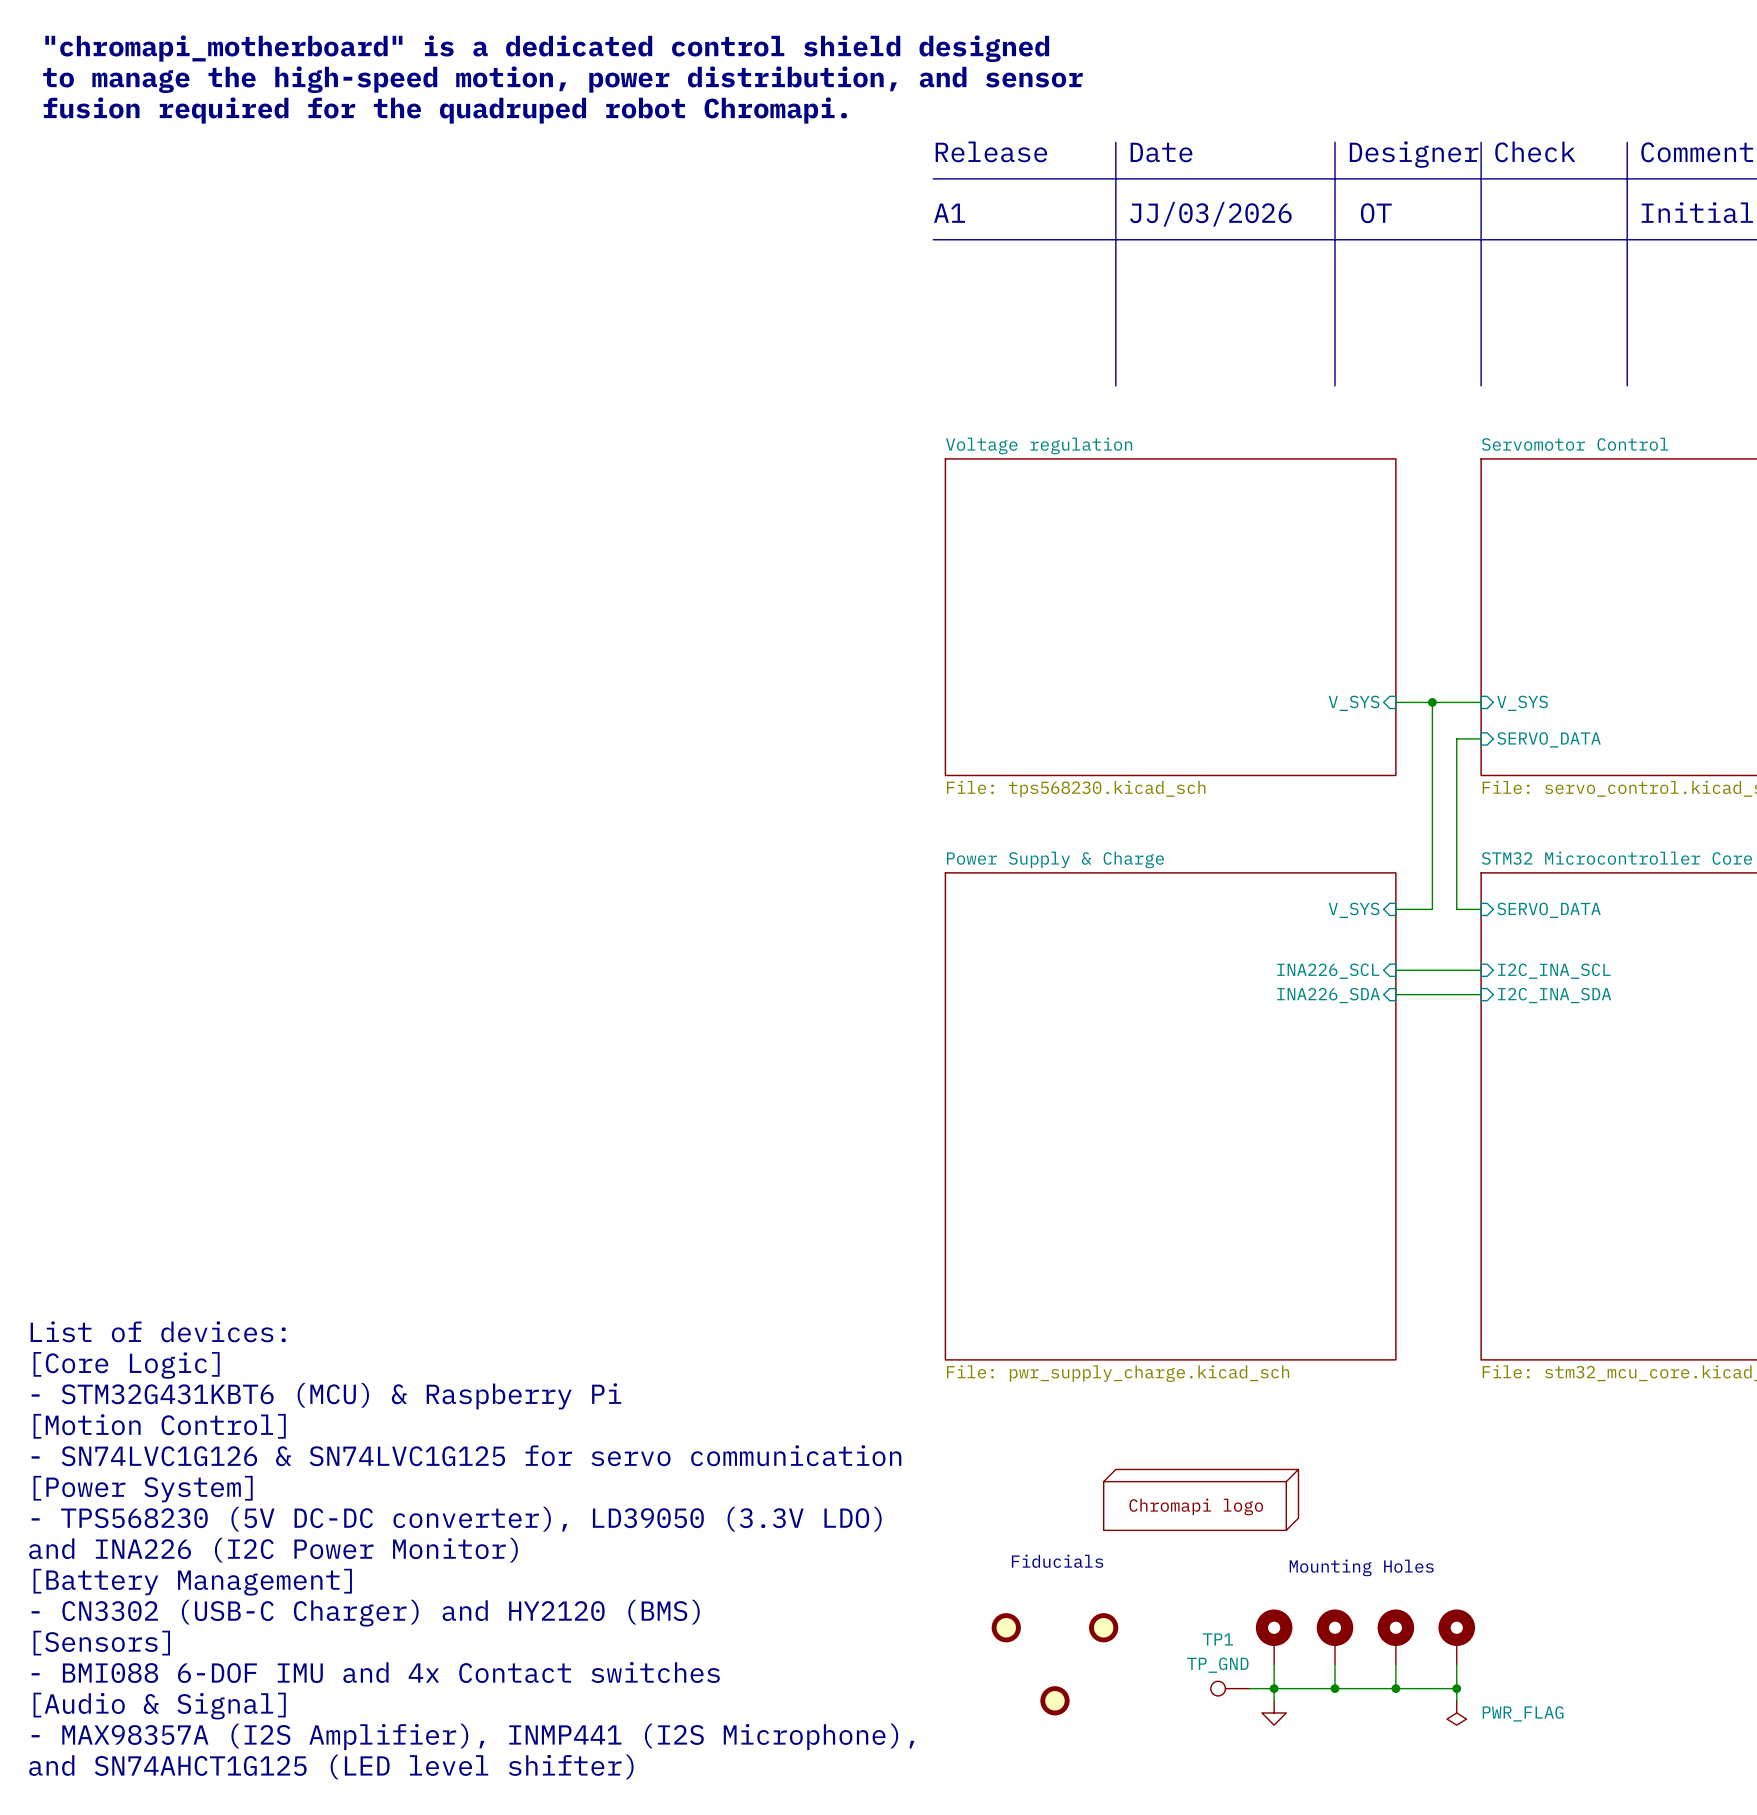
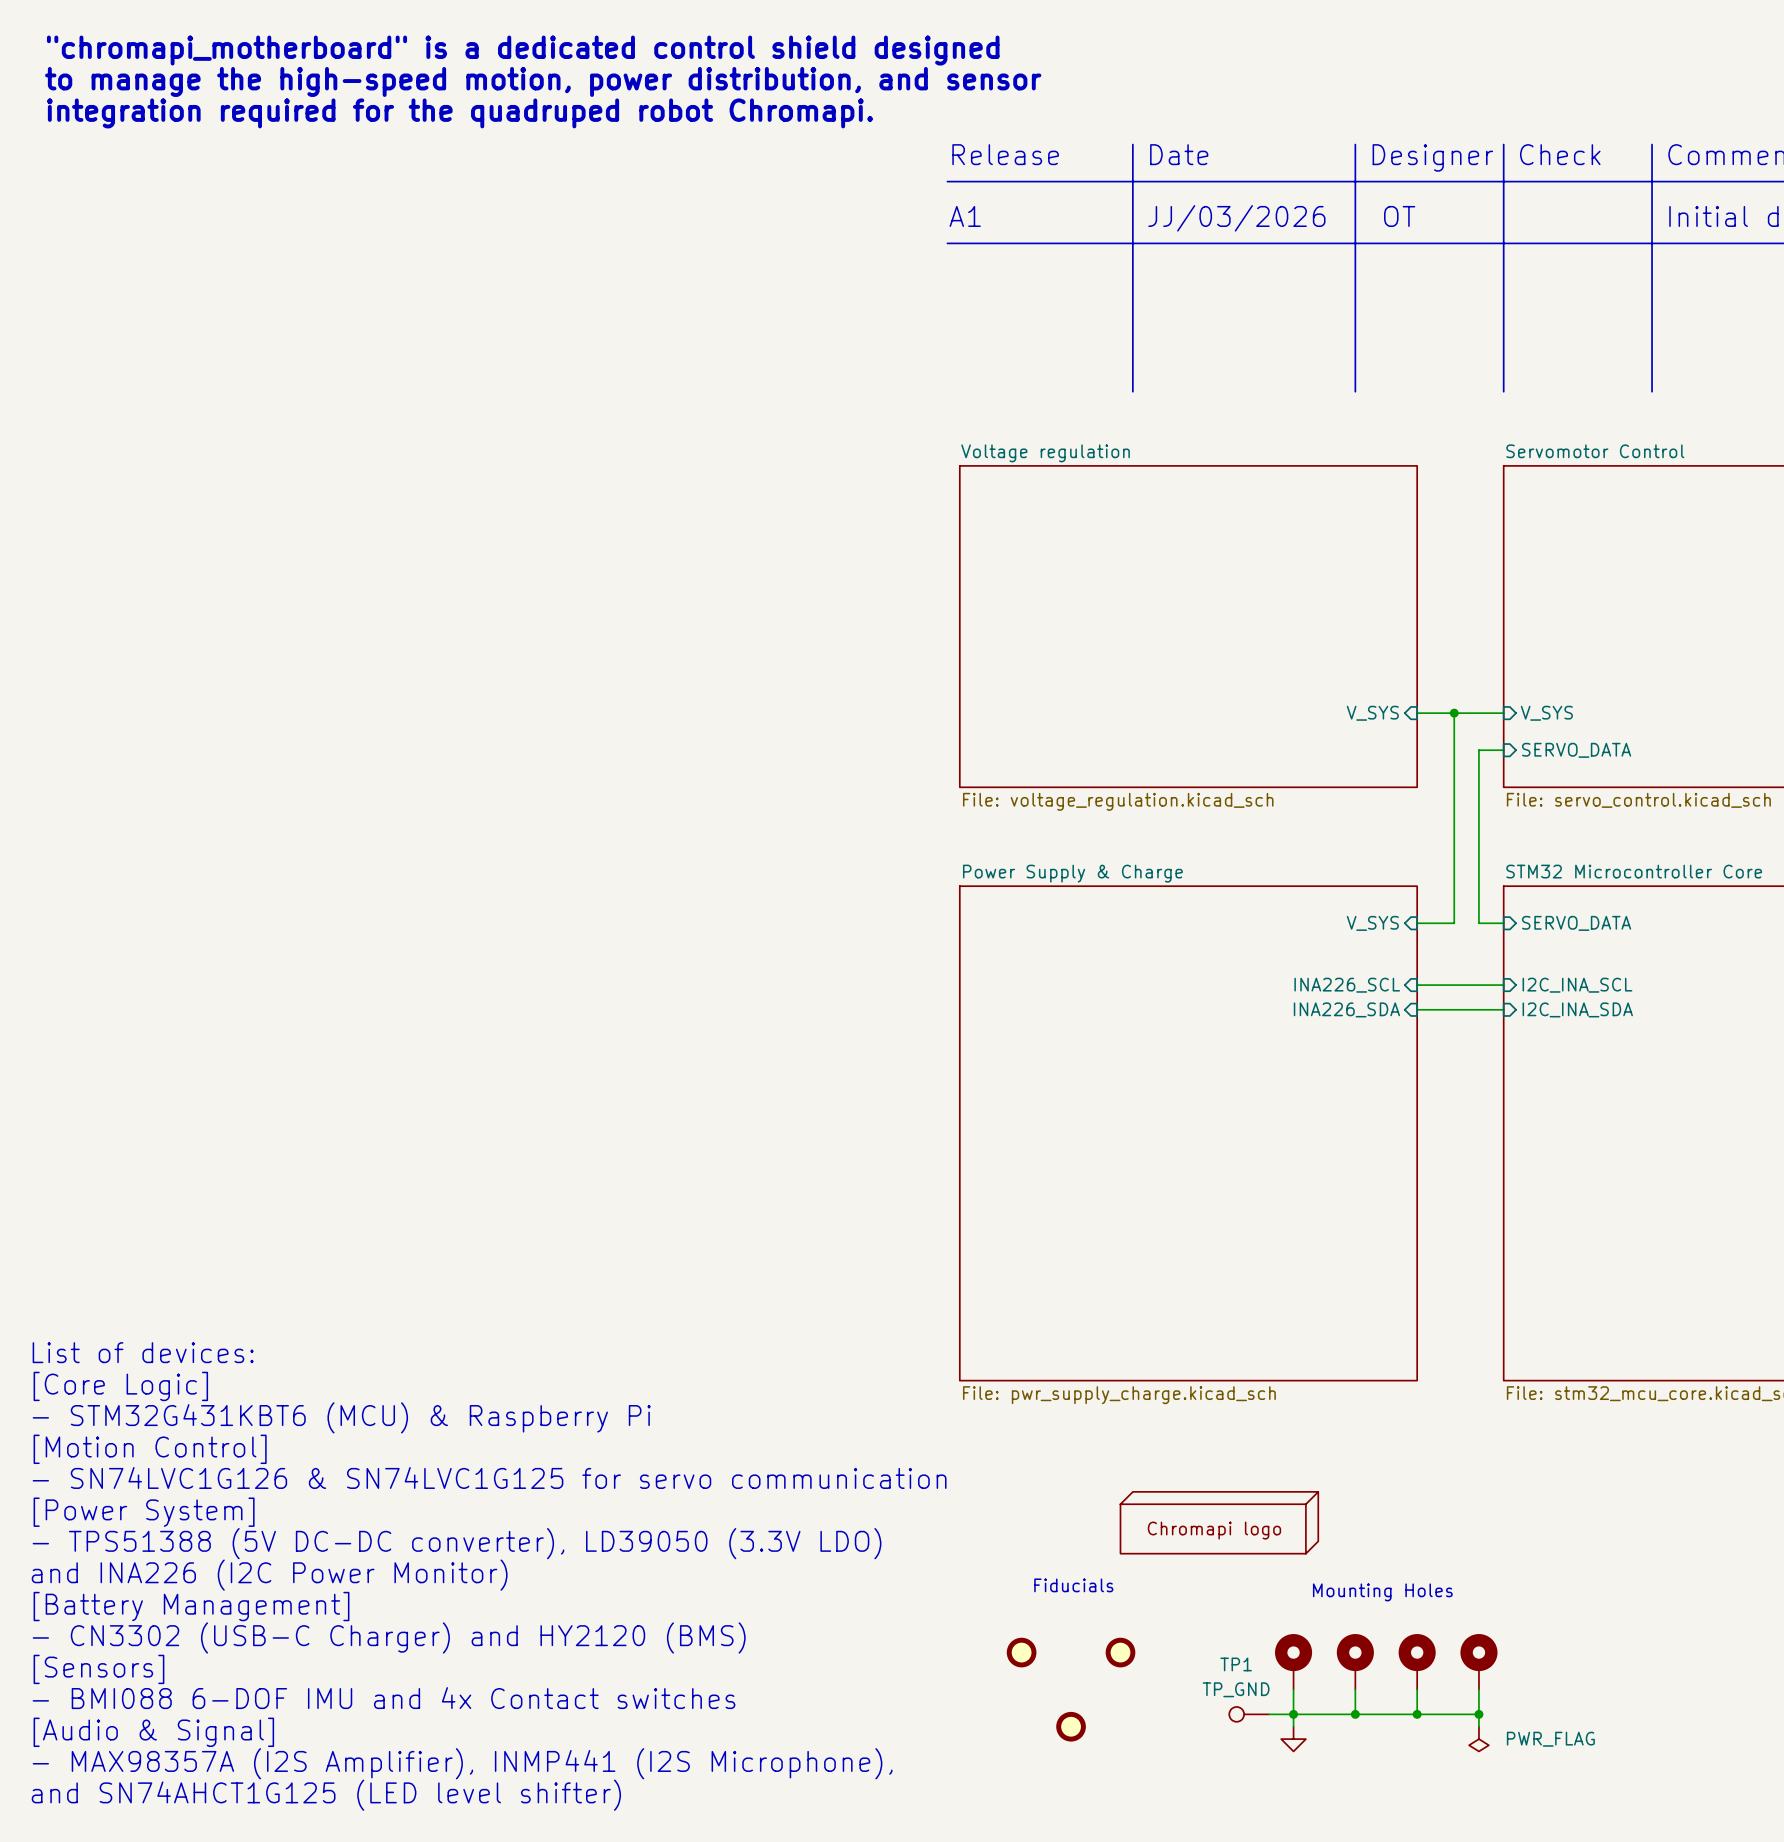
text: fusion required for the quadruped robot Chromapi. (445, 110) -> integration required for the quadruped robot Chromapi. (459, 113)
sheet Voltage regulation value: File: tps568230.kicad_sch (1076, 789) -> File: voltage_regulation.kicad_sch (1118, 801)
text: - TPS568230 (5V DC-DC converter), LD39050 (3.3V LDO) (456, 1519) -> - TPS51388 (5V DC-DC converter), LD39050 (3.3V LDO) (457, 1543)

